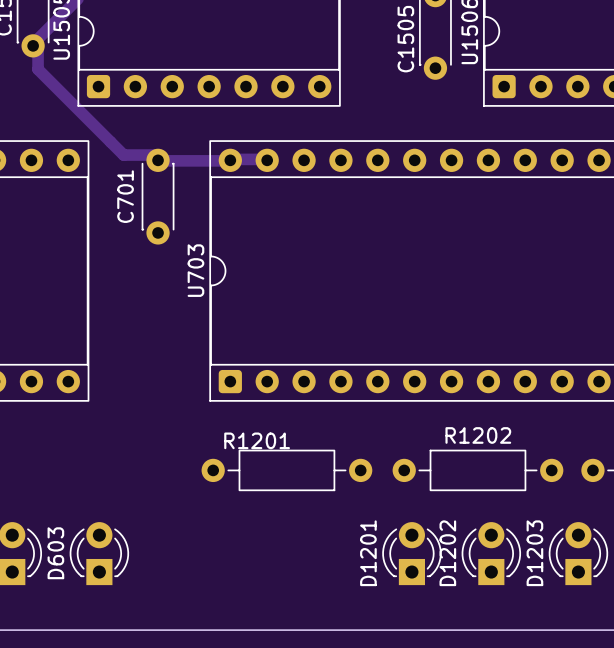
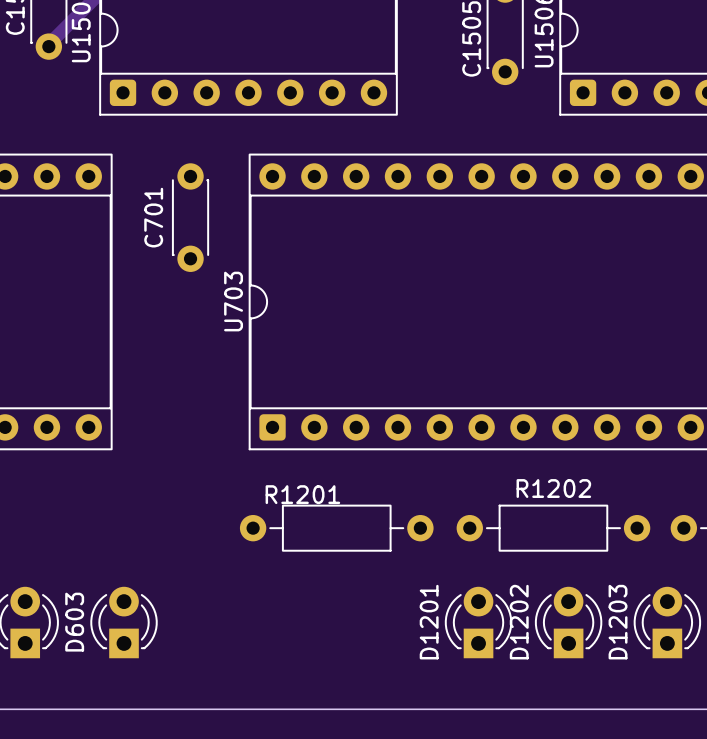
track: (38, 50) (38, 69) (123, 155) (154, 155) -> none
track: (236, 159) (261, 159) -> none
track: (164, 160) (223, 160) -> none

